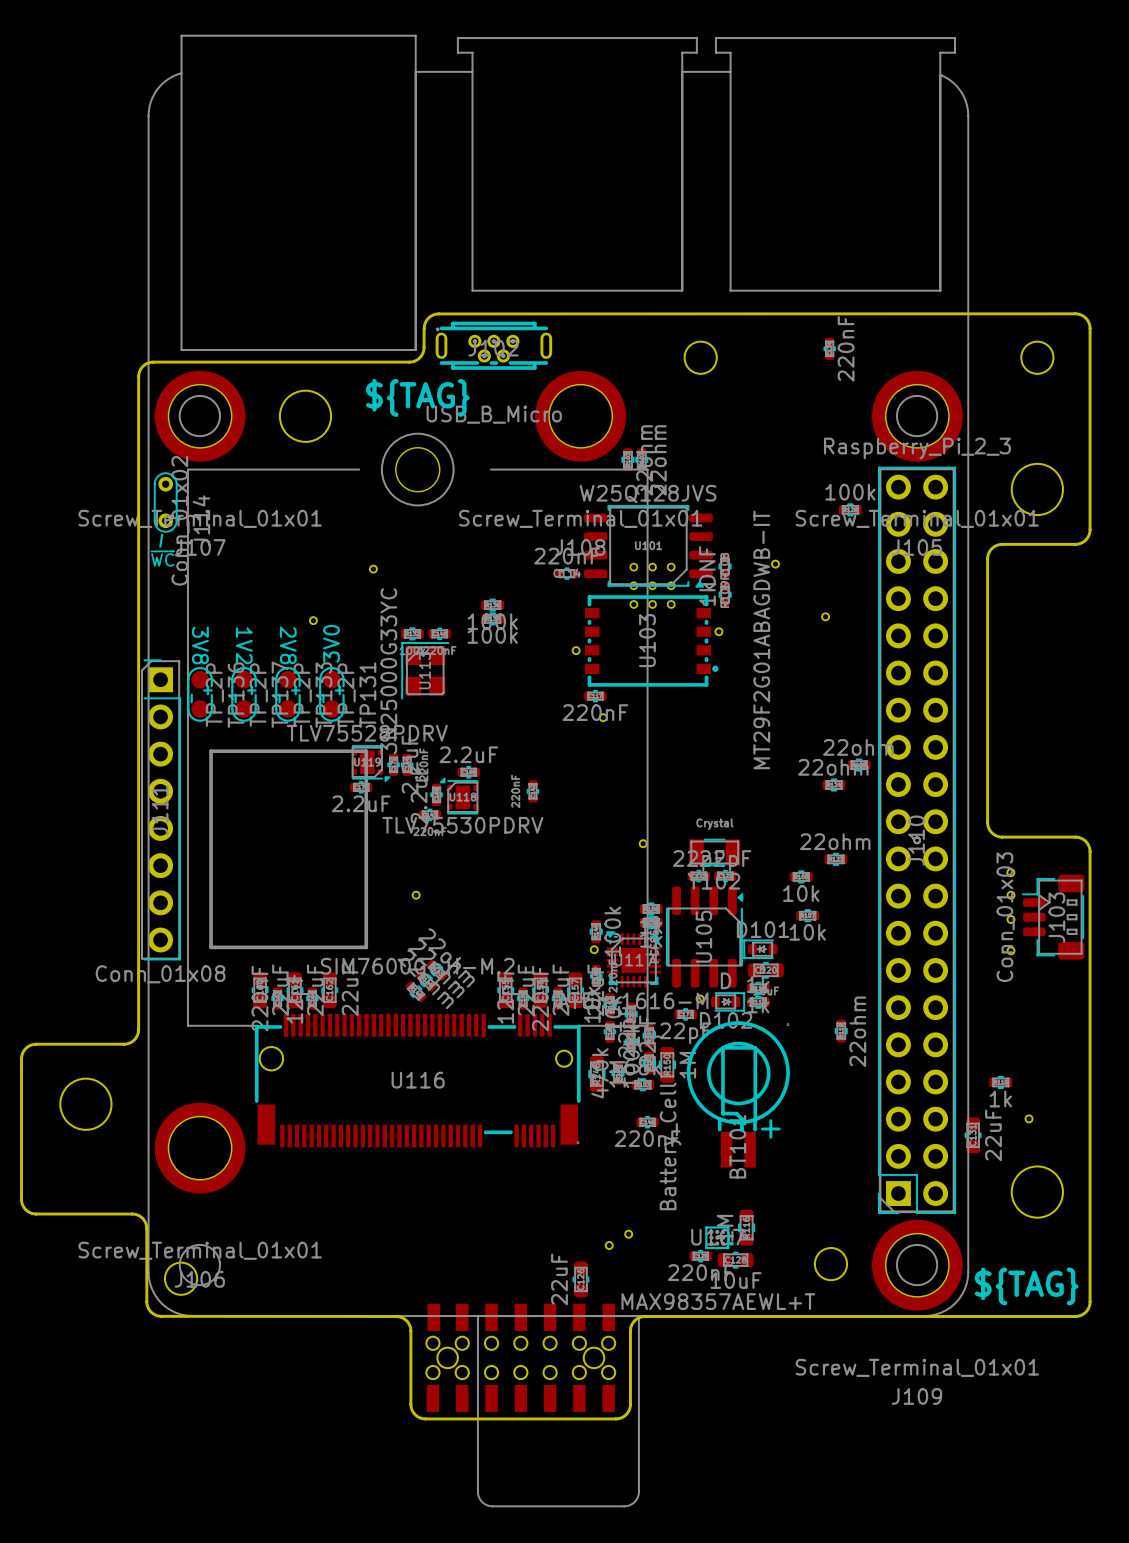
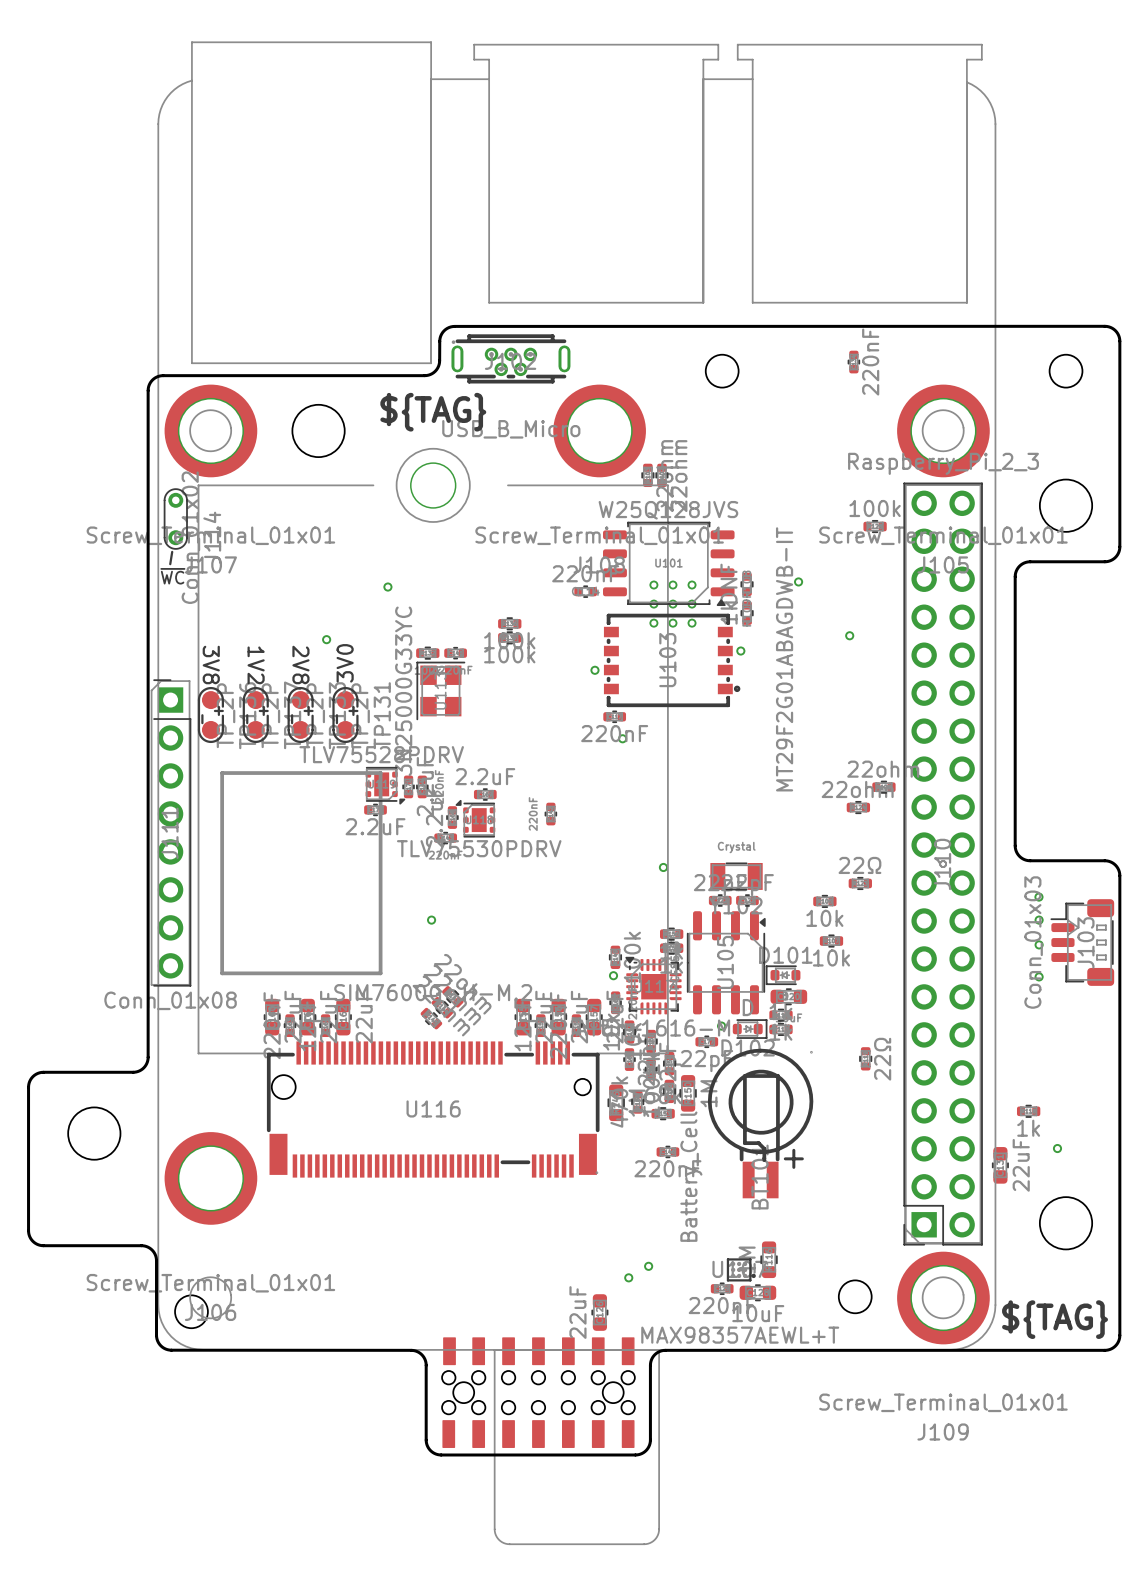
part value: 22ohm (835, 841) -> 22Ω (859, 865)
part value: 22ohm (857, 1031) -> 22Ω (882, 1059)

